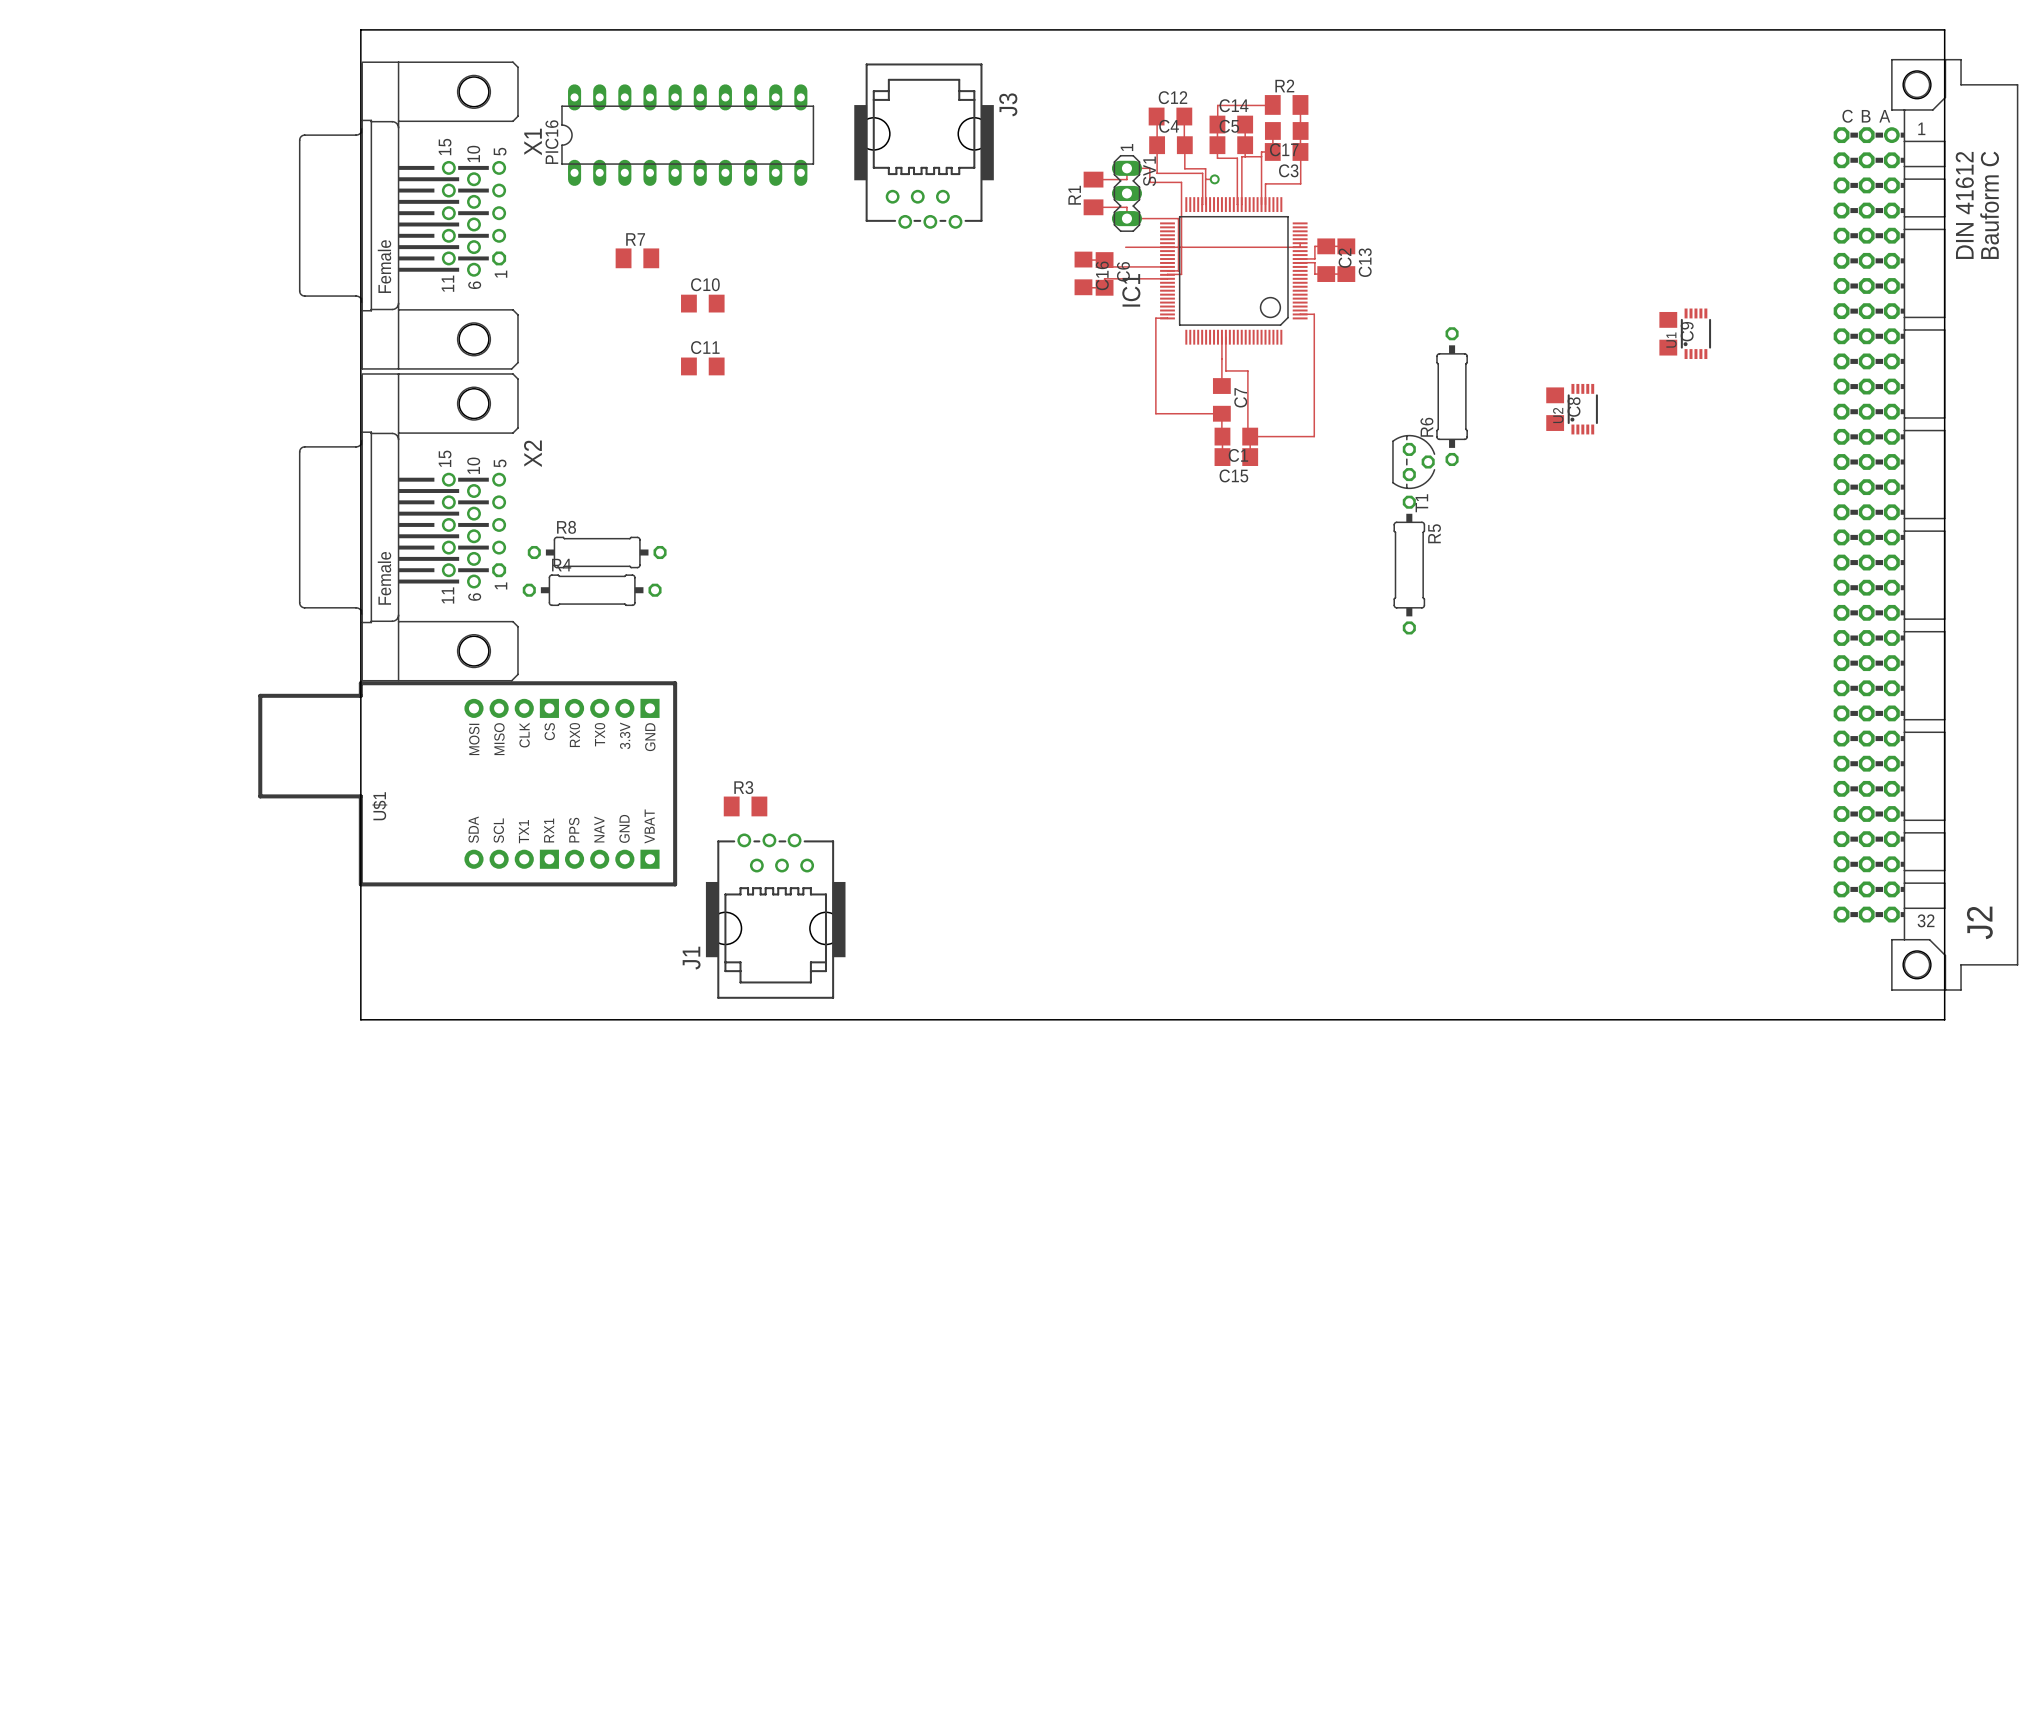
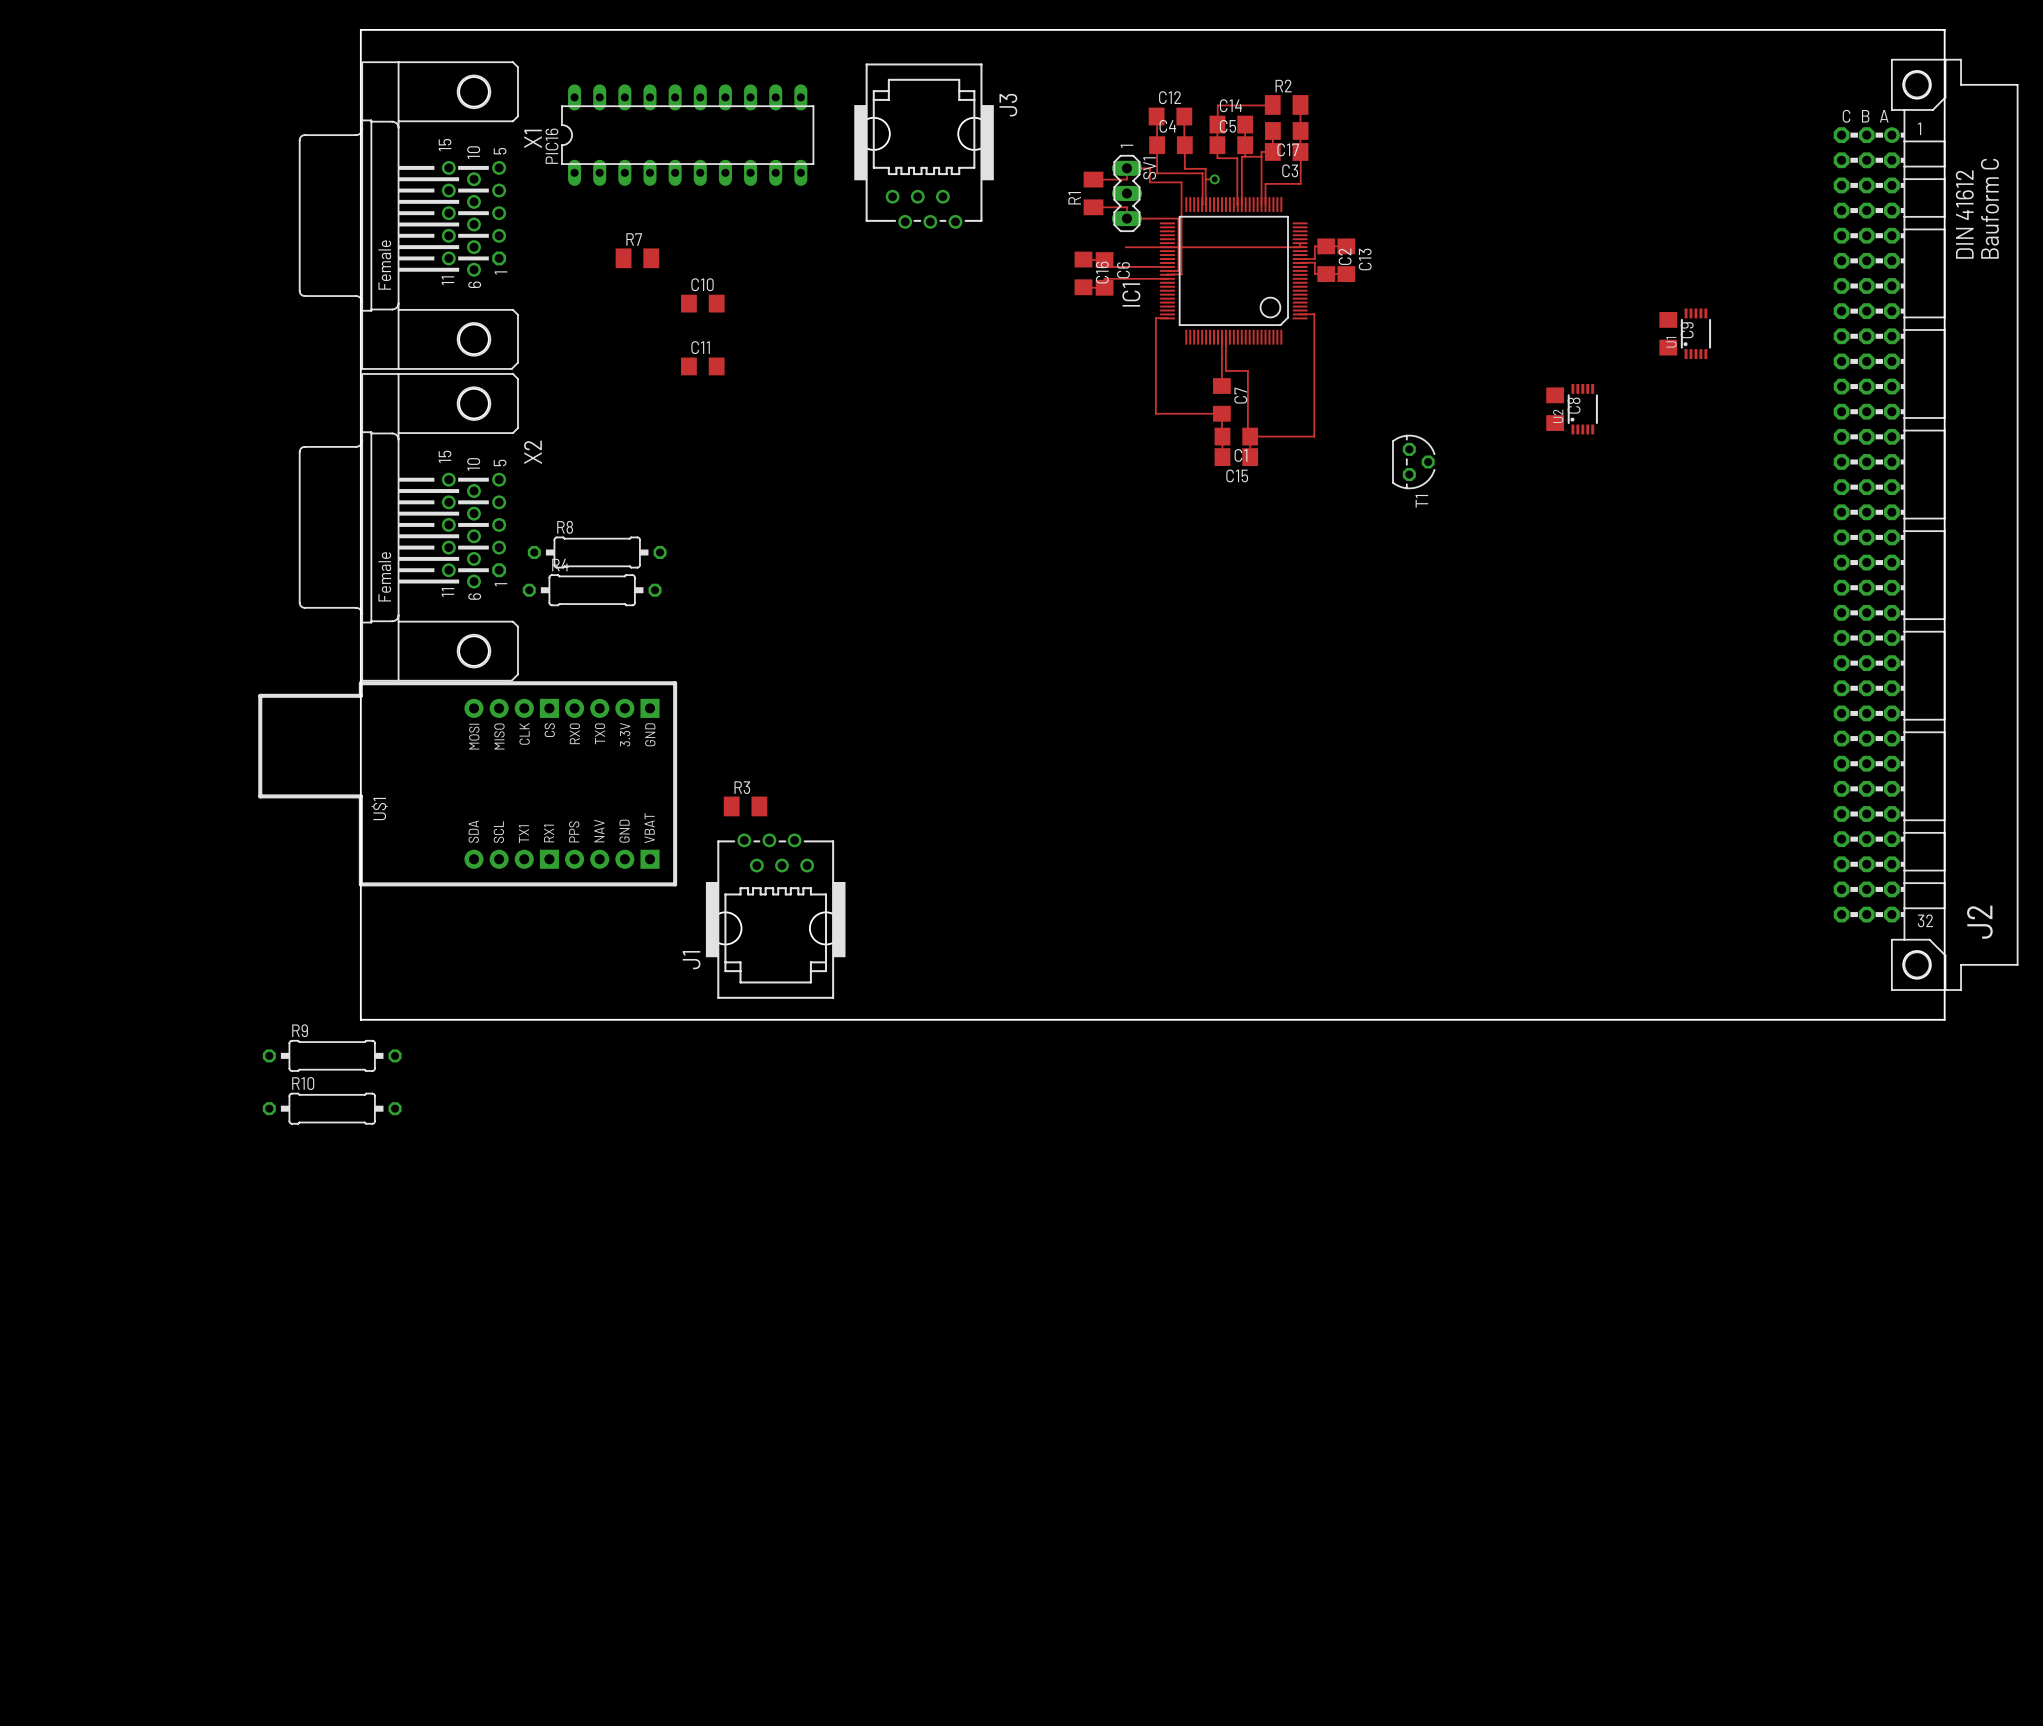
R6: (1452, 396) -> none
R5: (1409, 565) -> none
R9: none -> (332, 1055)
R10: none -> (332, 1108)

